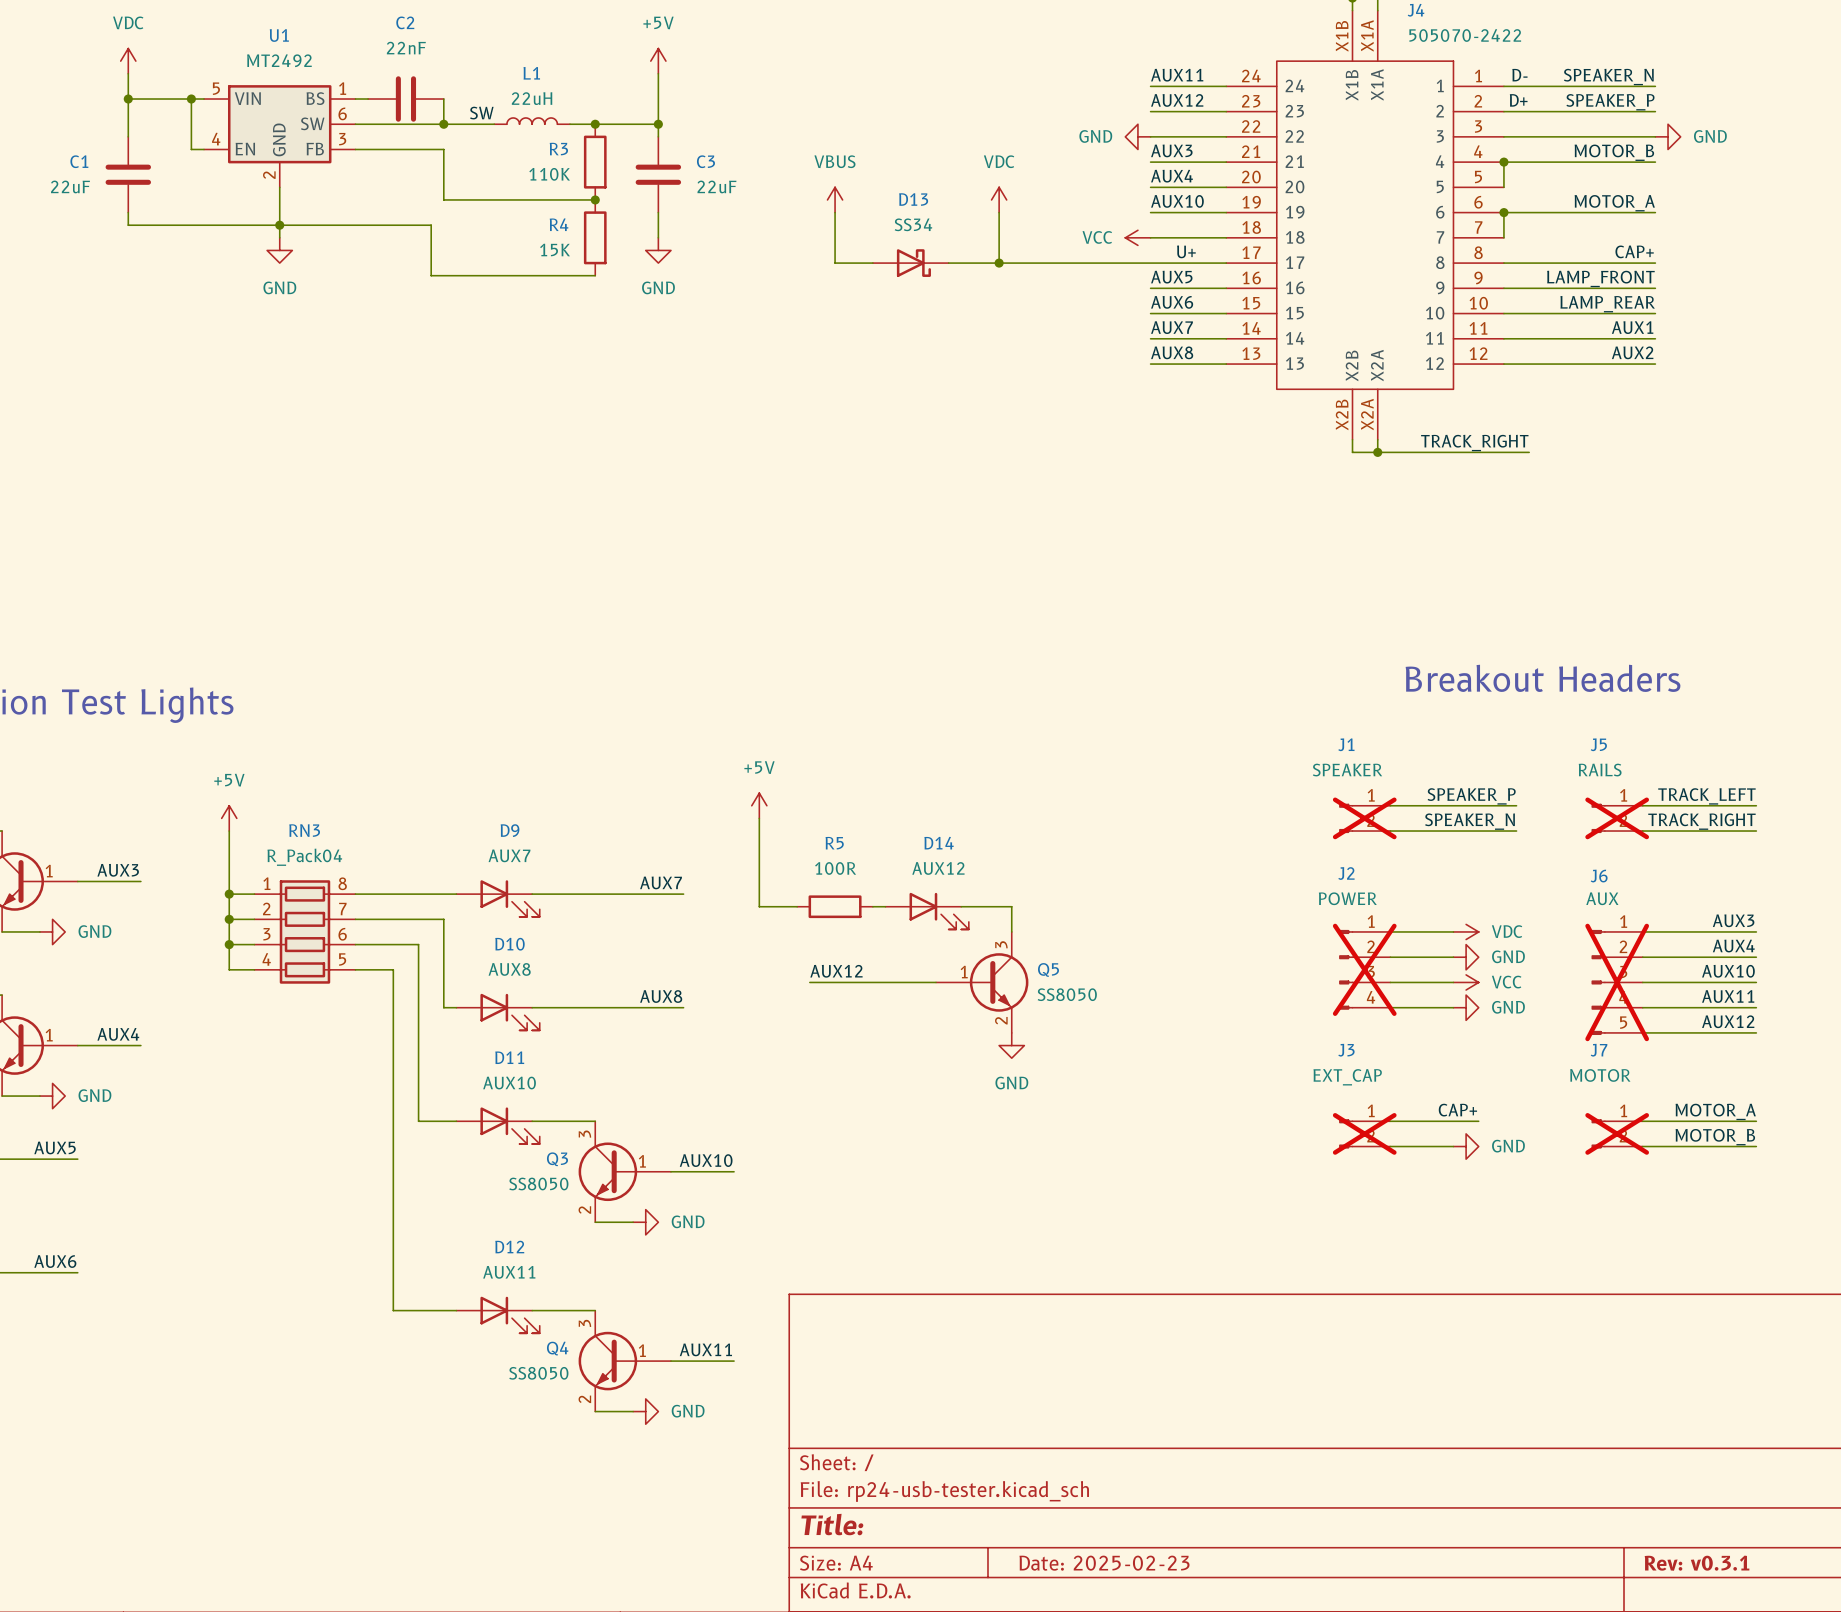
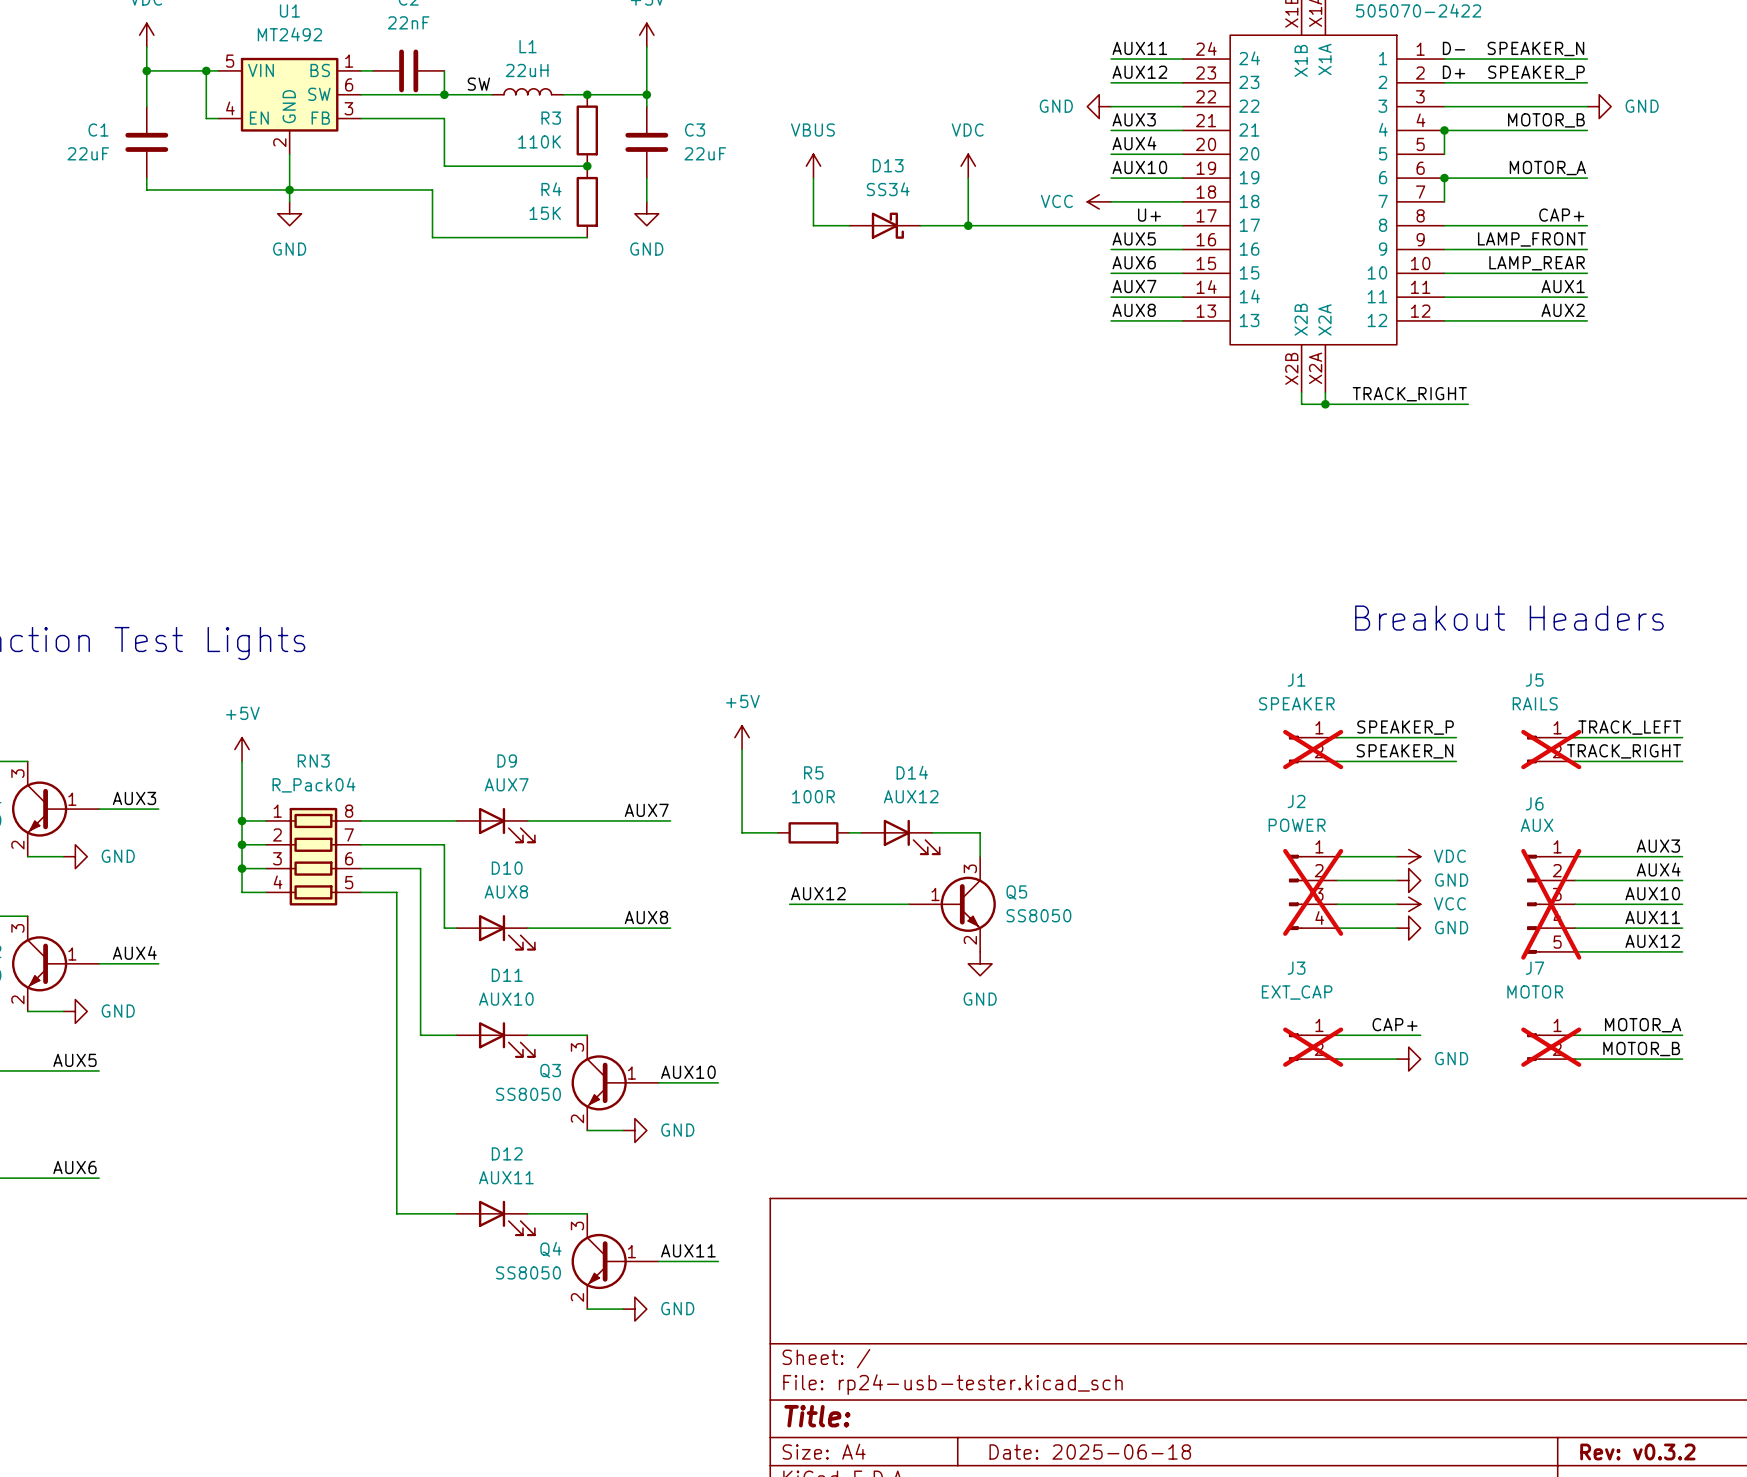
title block: Date: 2025-02-23 (1104, 1563) -> Date: 2025-06-18 (1090, 1451)
title block: Rev: v0.3.1 (1697, 1563) -> Rev: v0.3.2 (1637, 1451)

